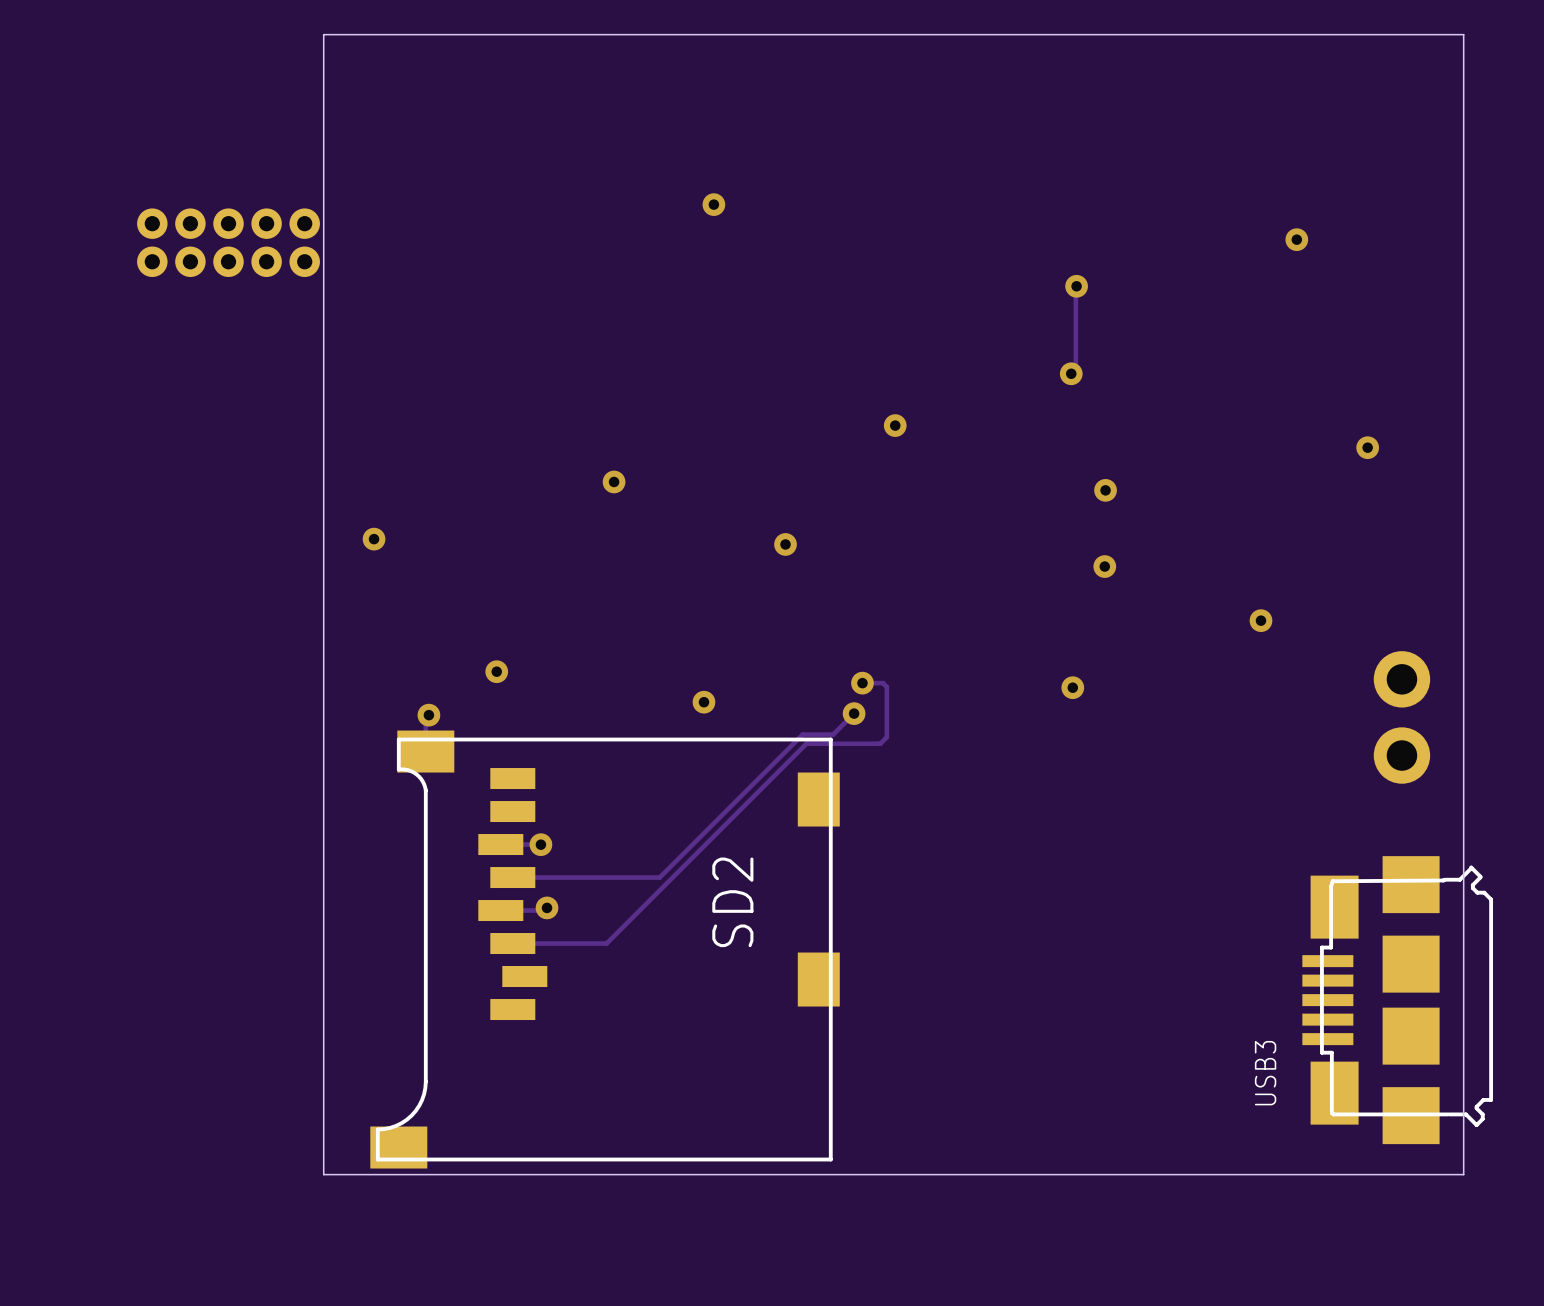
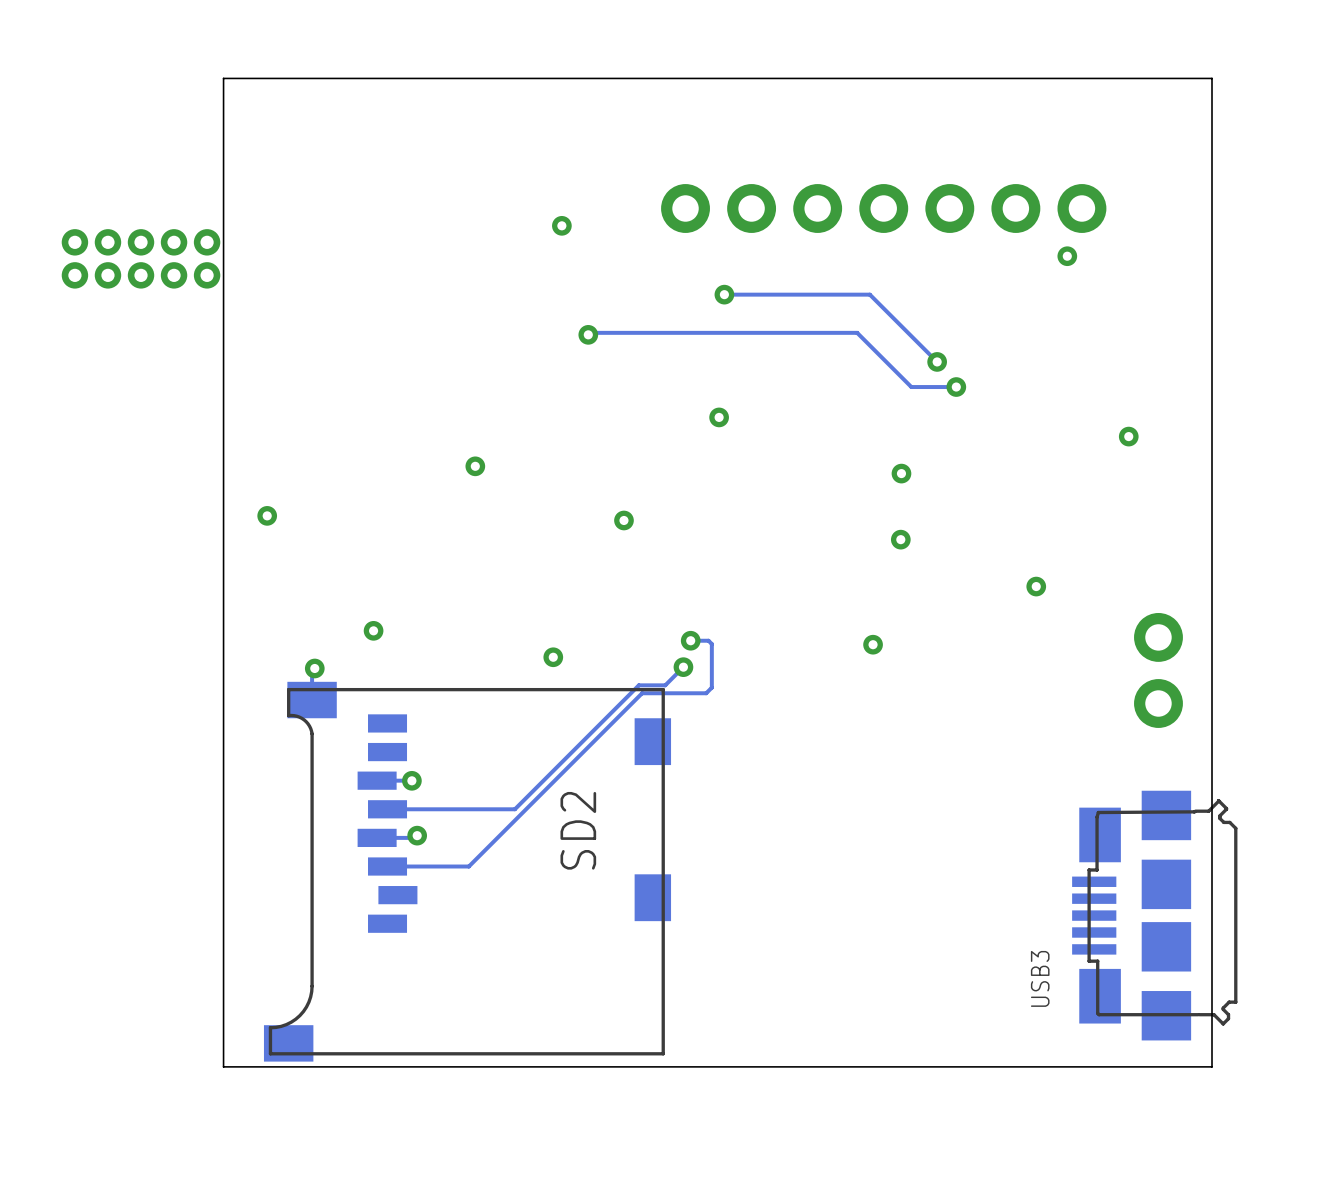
part: none -> (883, 208)
track: none -> (724, 294) (869, 294) (937, 361)
via: none -> (724, 294)
track: (1076, 286) (1075, 369) (1071, 373) -> none
via: (1076, 286) -> none
track: none -> (588, 334) (590, 332) (857, 332) (911, 387) (956, 387)
via: none -> (588, 334)
via: none -> (937, 361)
via: (1071, 373) -> none
via: none -> (956, 387)

